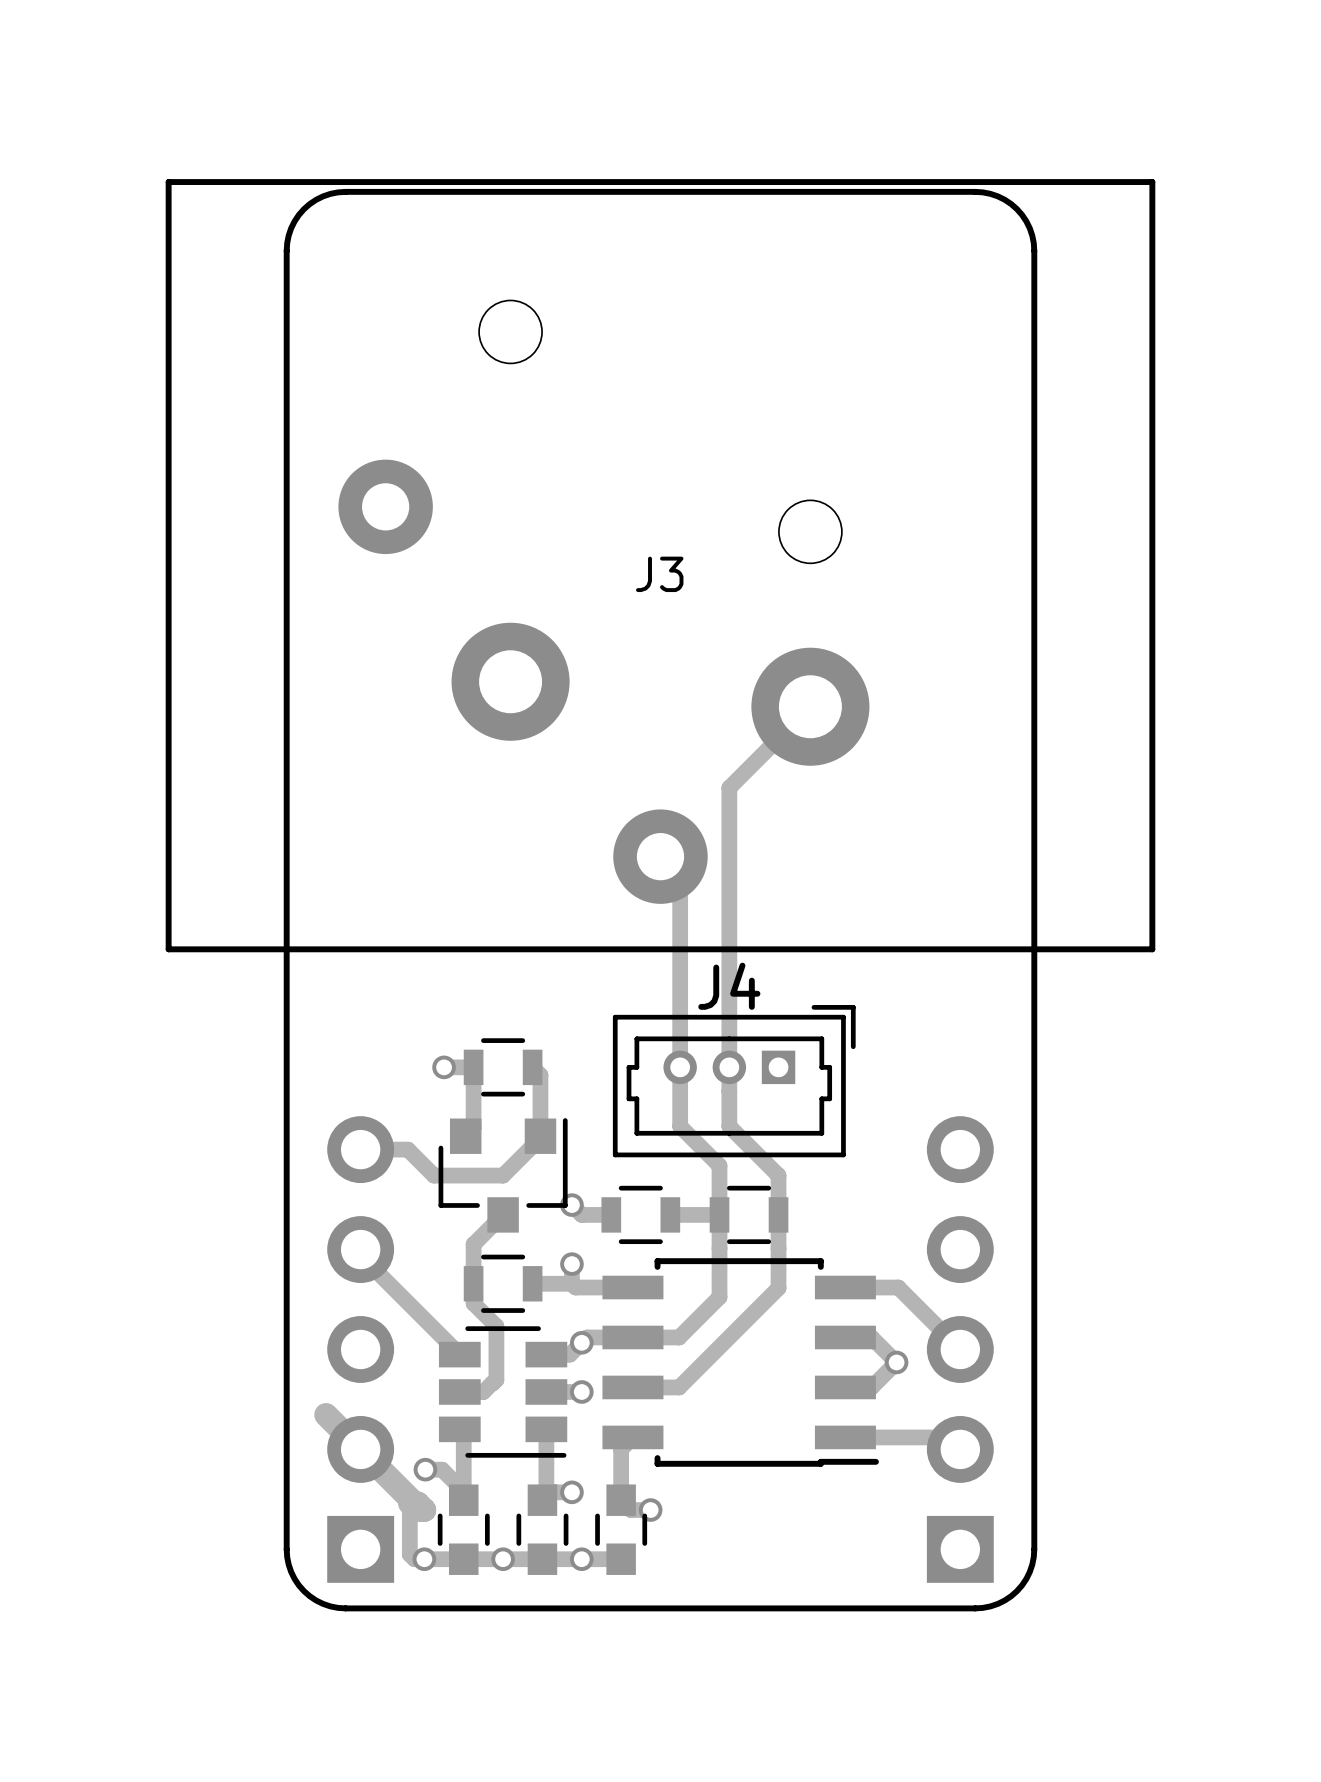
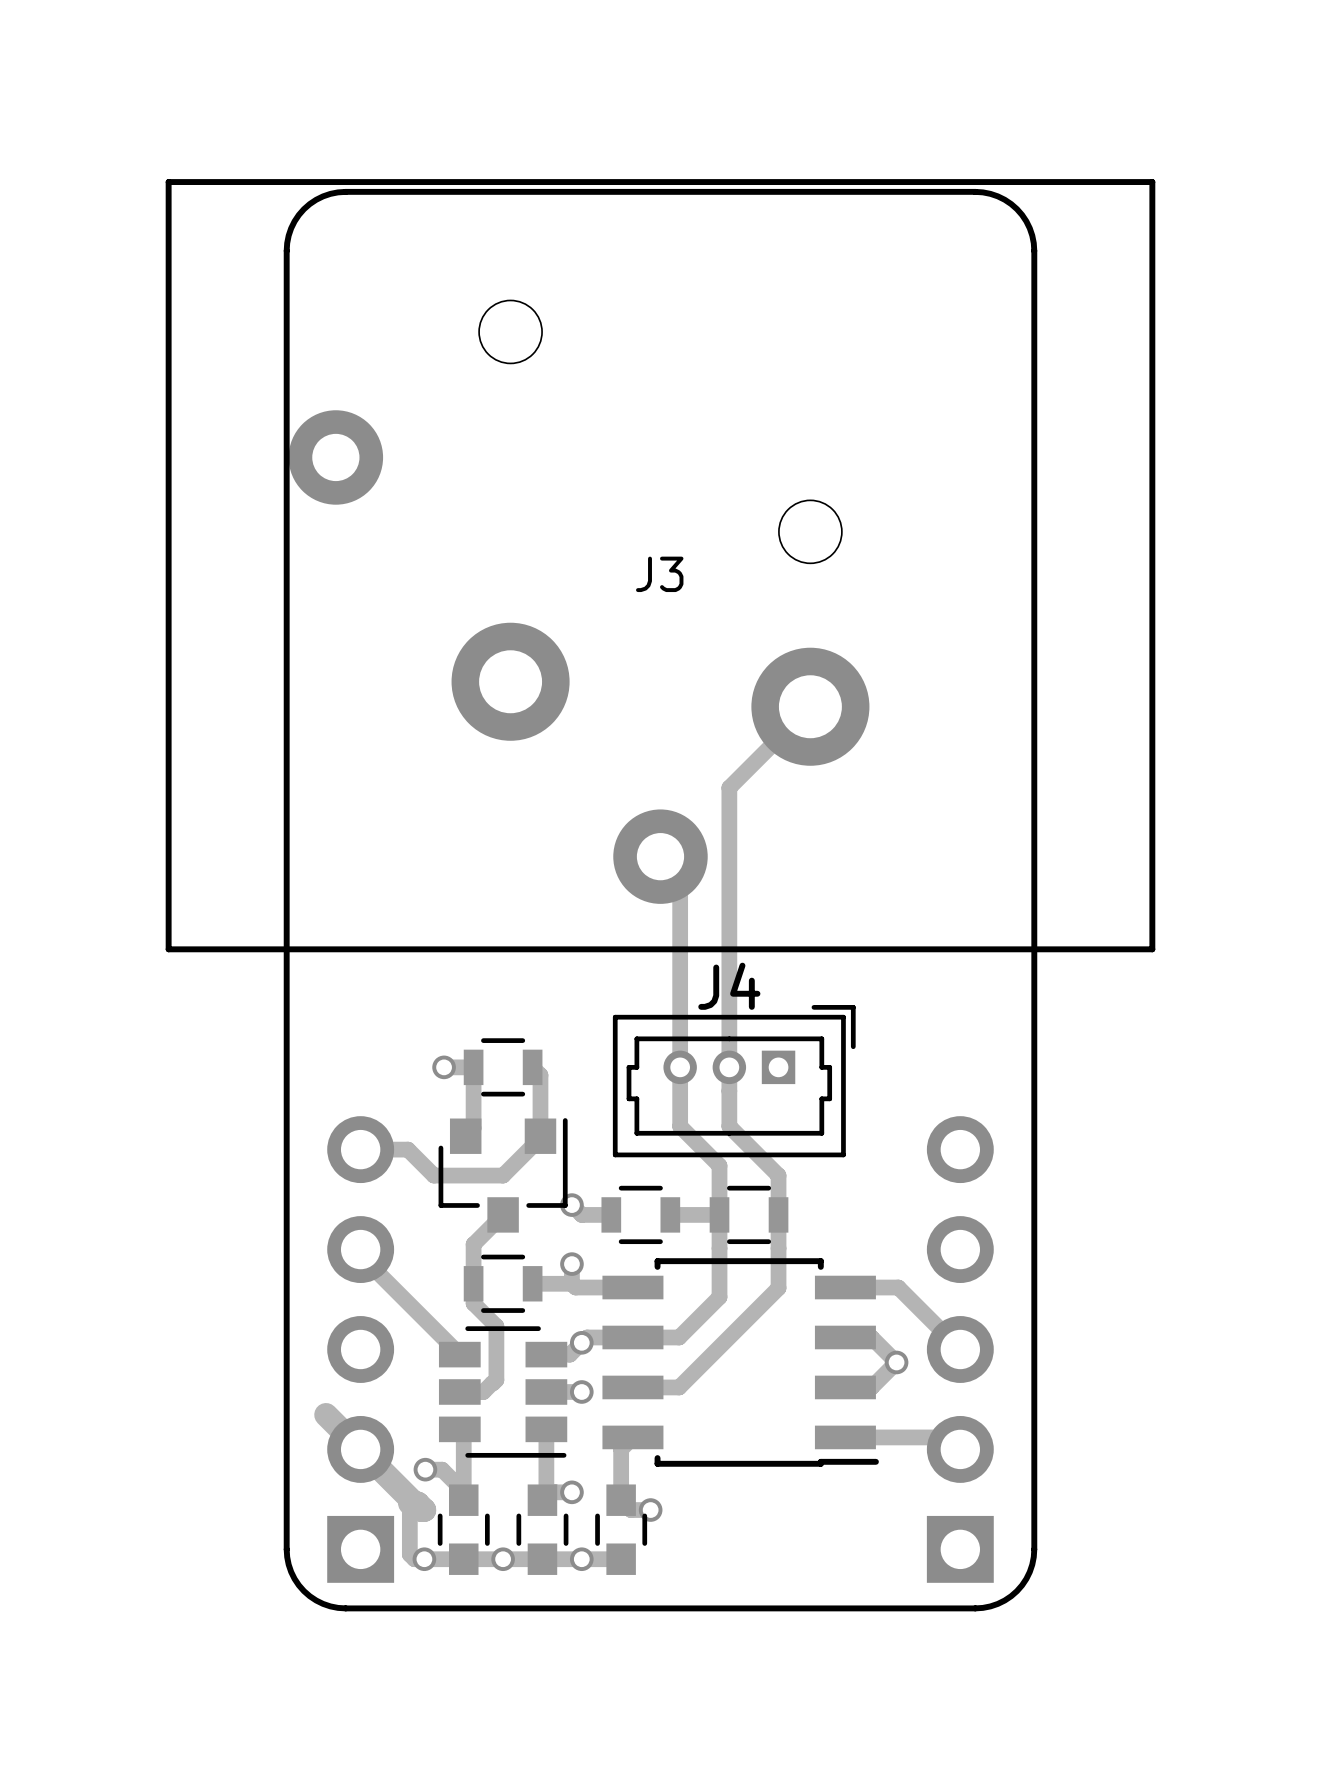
J3 footprint: [165, 179, 1156, 953] -> [165, 179, 1156, 953]

